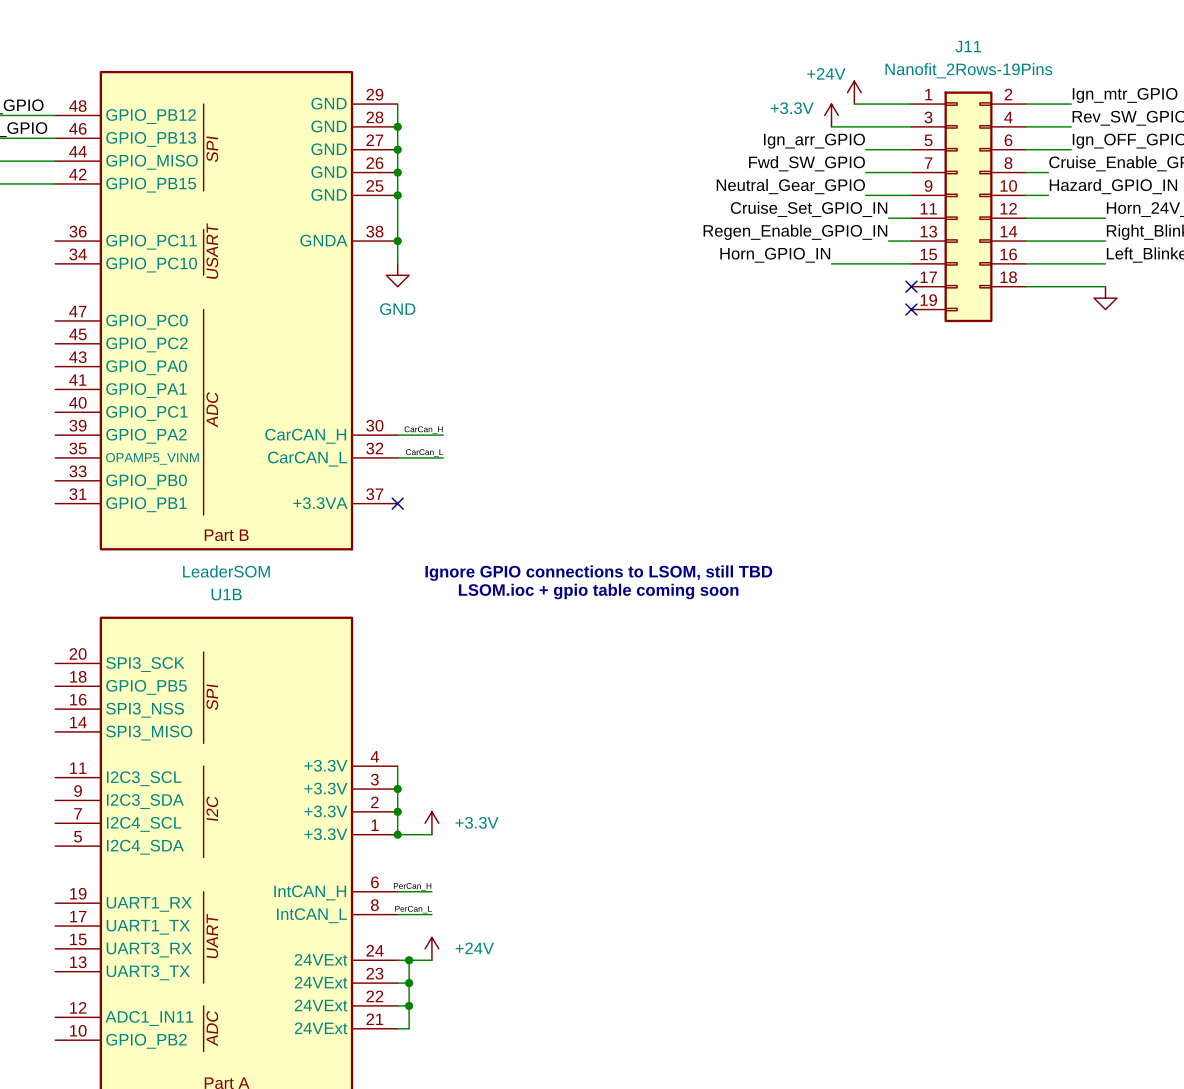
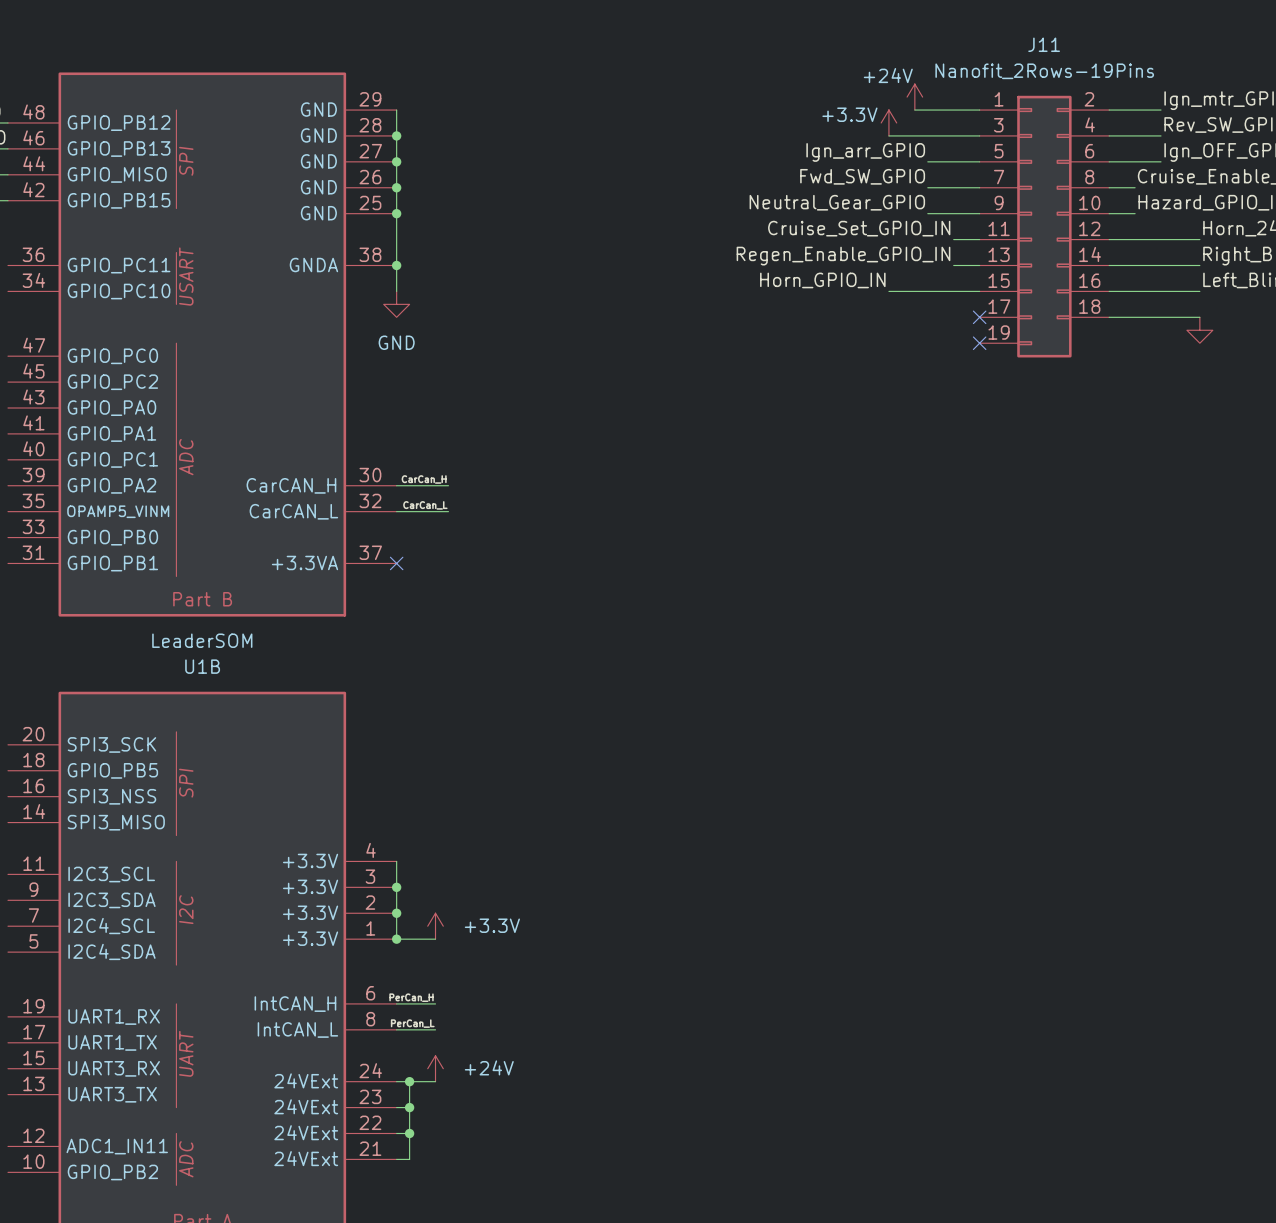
text: Ignore GPIO connections to LSOM, still TBD (598, 573) -> none
text: LSOM.ioc + gpio table coming soon (598, 591) -> none

